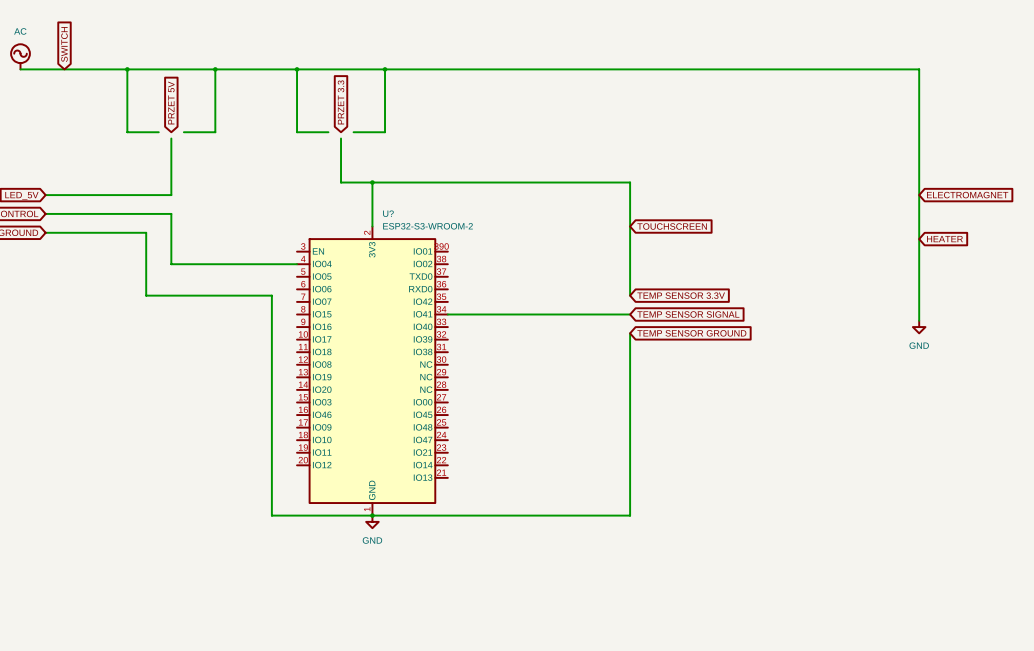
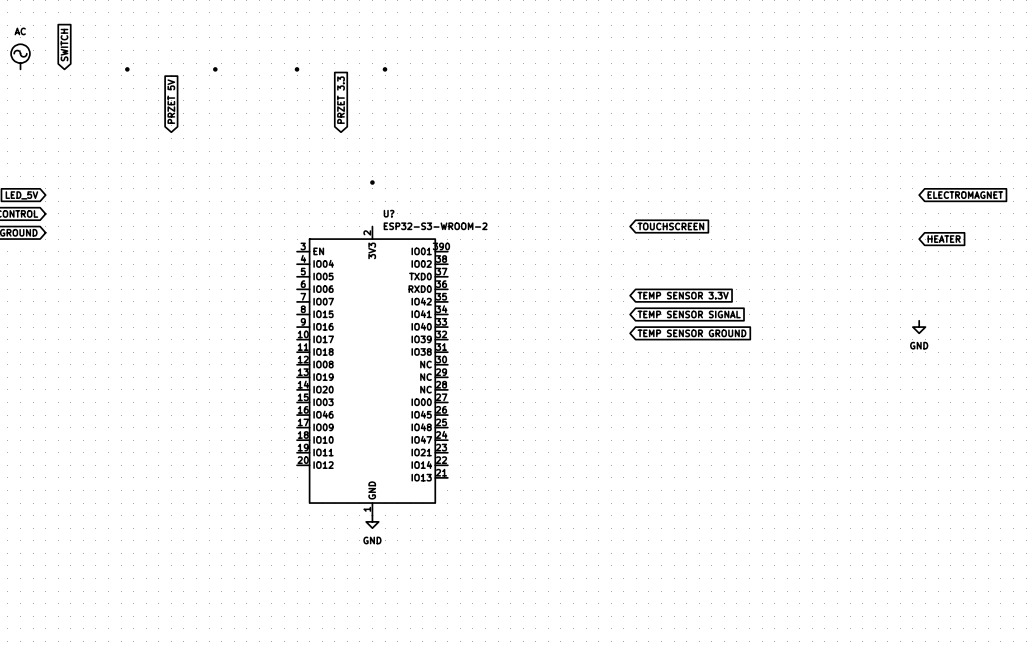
wire: (20, 69) (919, 69) (919, 320) -> none
wire: (127, 69) (127, 132) (158, 132) -> none
wire: (215, 69) (215, 132) (183, 132) -> none
wire: (297, 69) (297, 132) (328, 132) -> none
wire: (385, 69) (385, 132) (353, 132) -> none
wire: (171, 138) (171, 195) (45, 195) -> none
wire: (341, 138) (341, 182) (630, 182) (630, 295) -> none
wire: (372, 182) (372, 226) -> none
wire: (45, 213) (171, 213) (171, 264) (297, 264) -> none
wire: (45, 232) (146, 232) (146, 295) (271, 295) (271, 515) (630, 515) (630, 333) -> none
wire: (447, 314) (630, 314) -> none
junction: (372, 515) -> none

